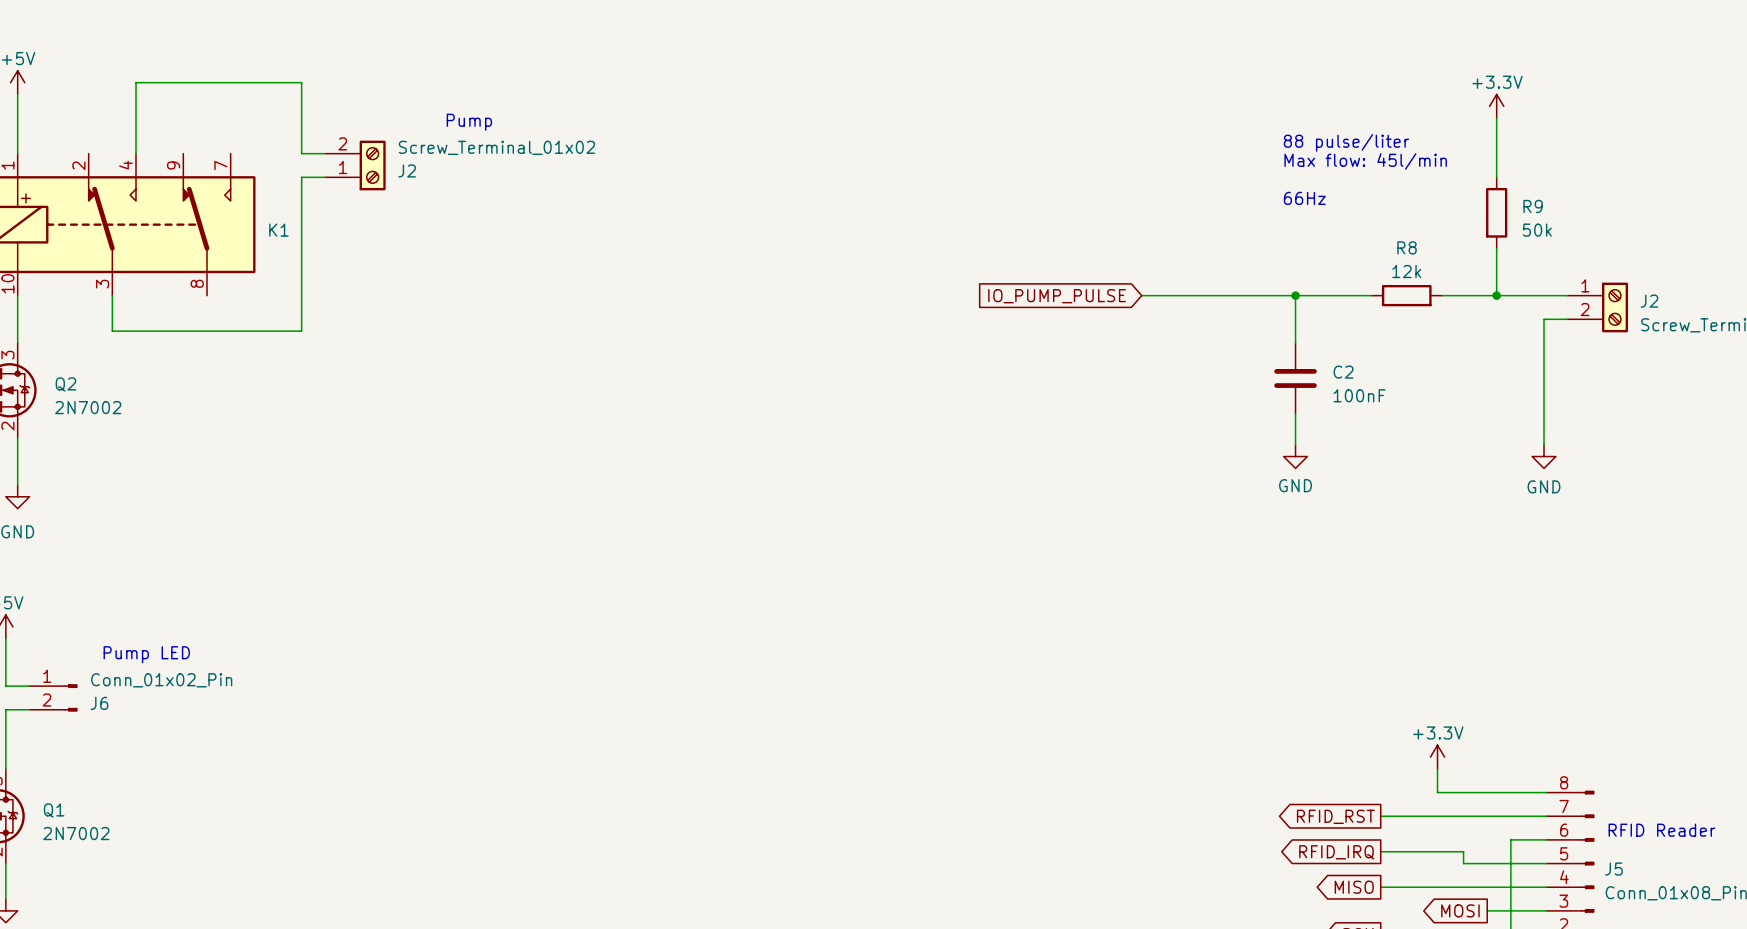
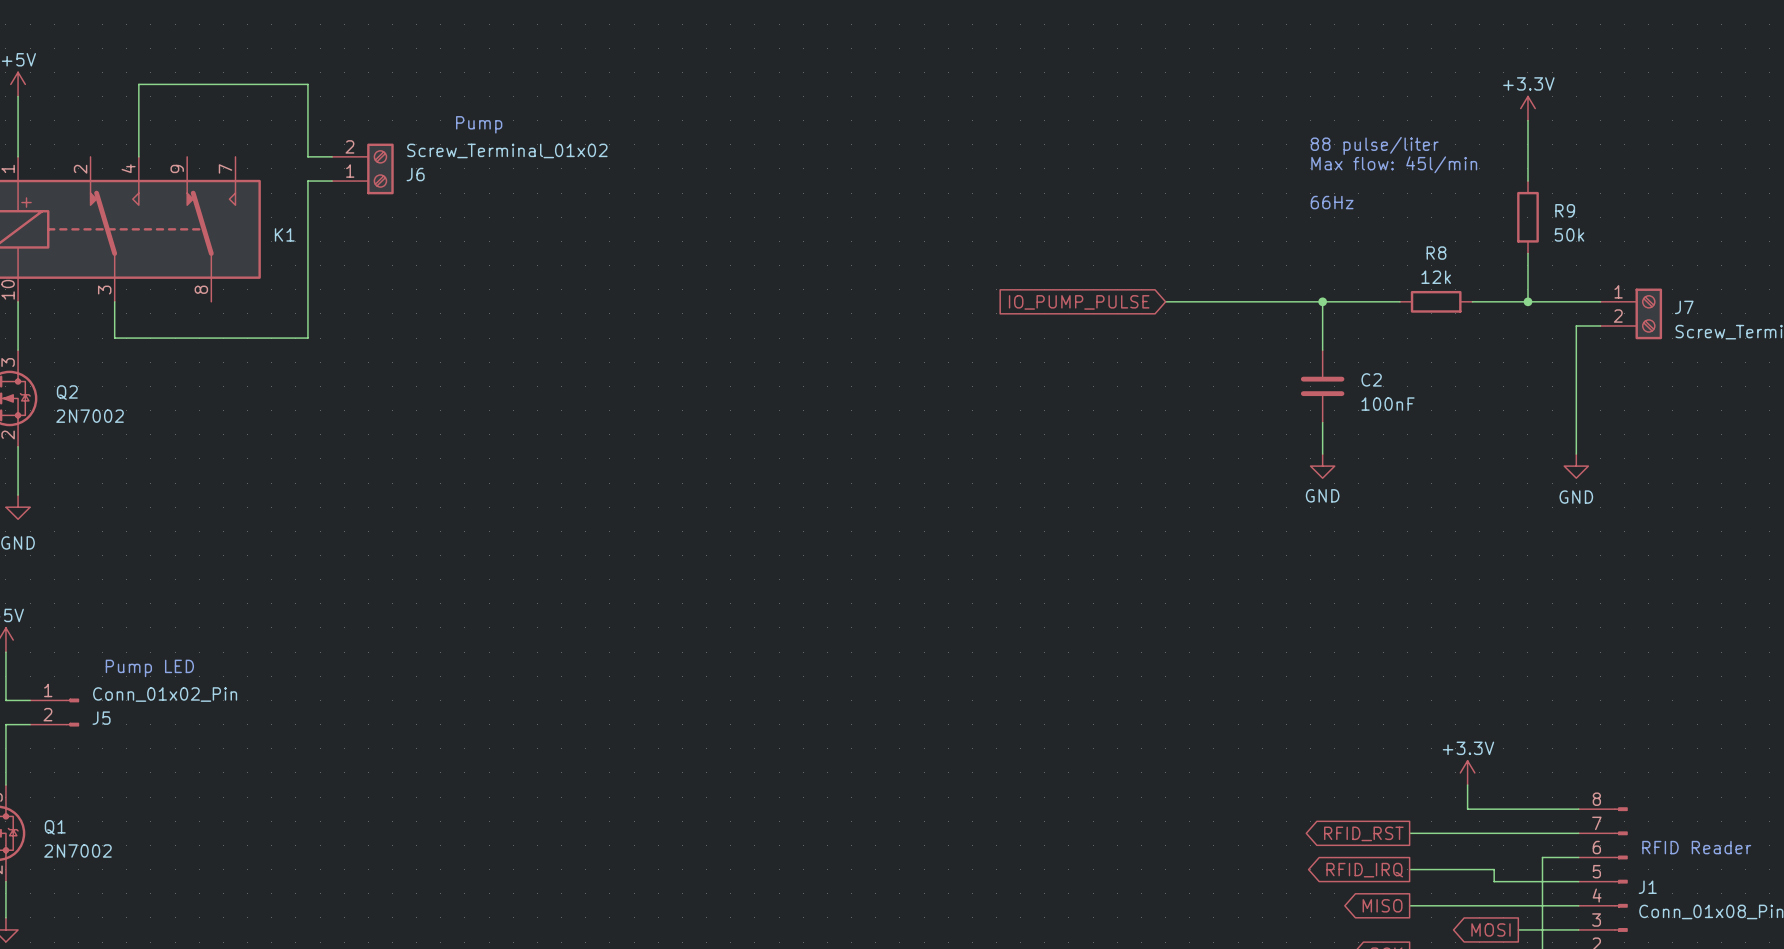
J2 name: J2 (407, 170) -> J6 (415, 174)
J2 name: J2 (1649, 301) -> J7 (1684, 307)
J6 name: J6 (99, 703) -> J5 (101, 718)
J5 name: J5 (1613, 869) -> J1 (1647, 887)

